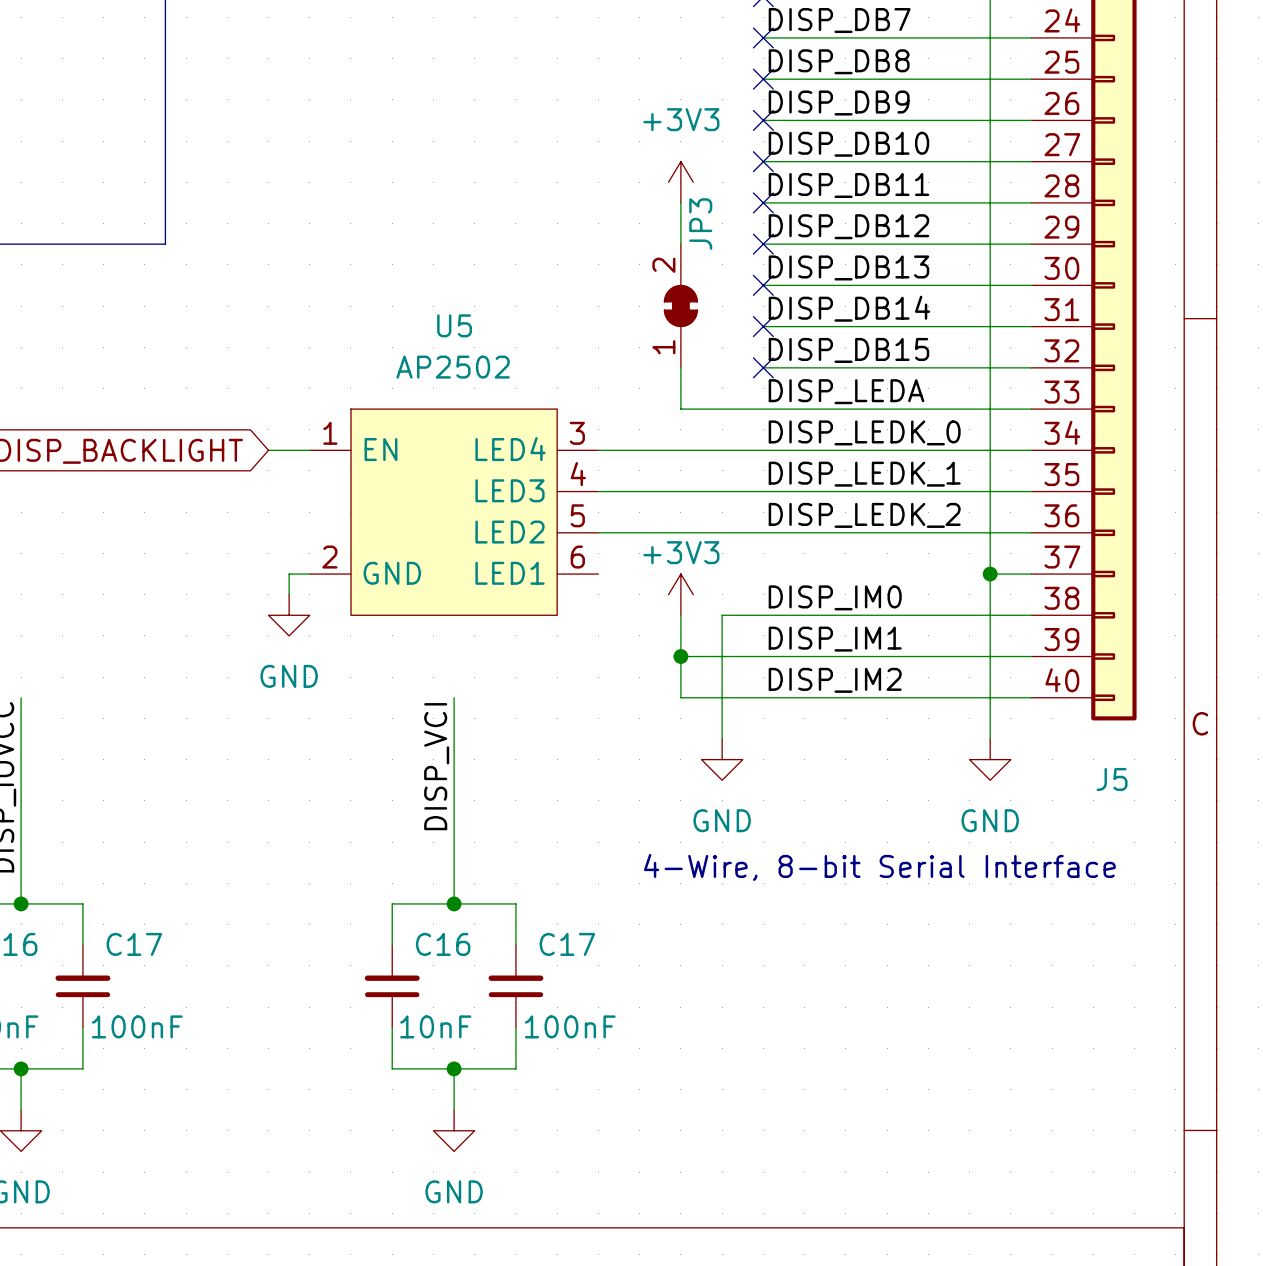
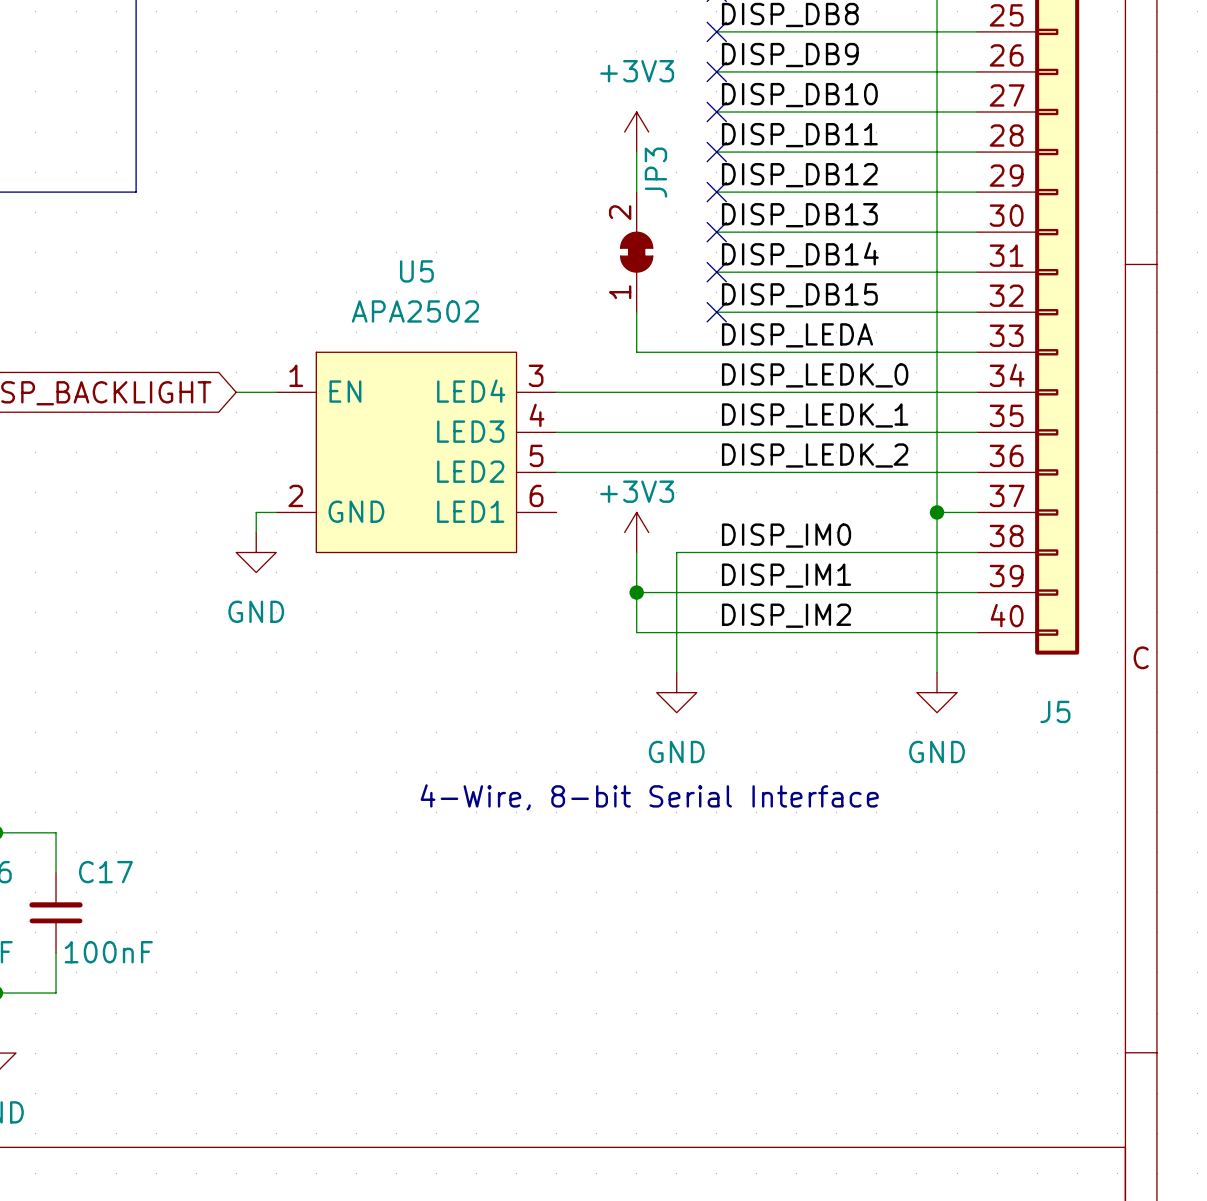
U5 value: AP2502 (453, 367) -> APA2502 (415, 311)
wire: (454, 697) (454, 903) -> none
label: DISP_VCI (436, 766) -> none
text position: 4-Wire, 8-bit Serial Interface (879, 867) -> 4-Wire, 8-bit Serial Interface (649, 797)
junction: (454, 903) -> none
wire: (392, 945) (392, 903) (515, 903) (515, 945) -> none
C16: 10nF (392, 986) -> none
C17: 100nF (515, 986) -> none
wire: (392, 1027) (392, 1068) (515, 1068) (515, 1027) -> none
wire: (454, 1068) (454, 1110) -> none
junction: (454, 1068) -> none
power symbol: GND (454, 1130) -> none

